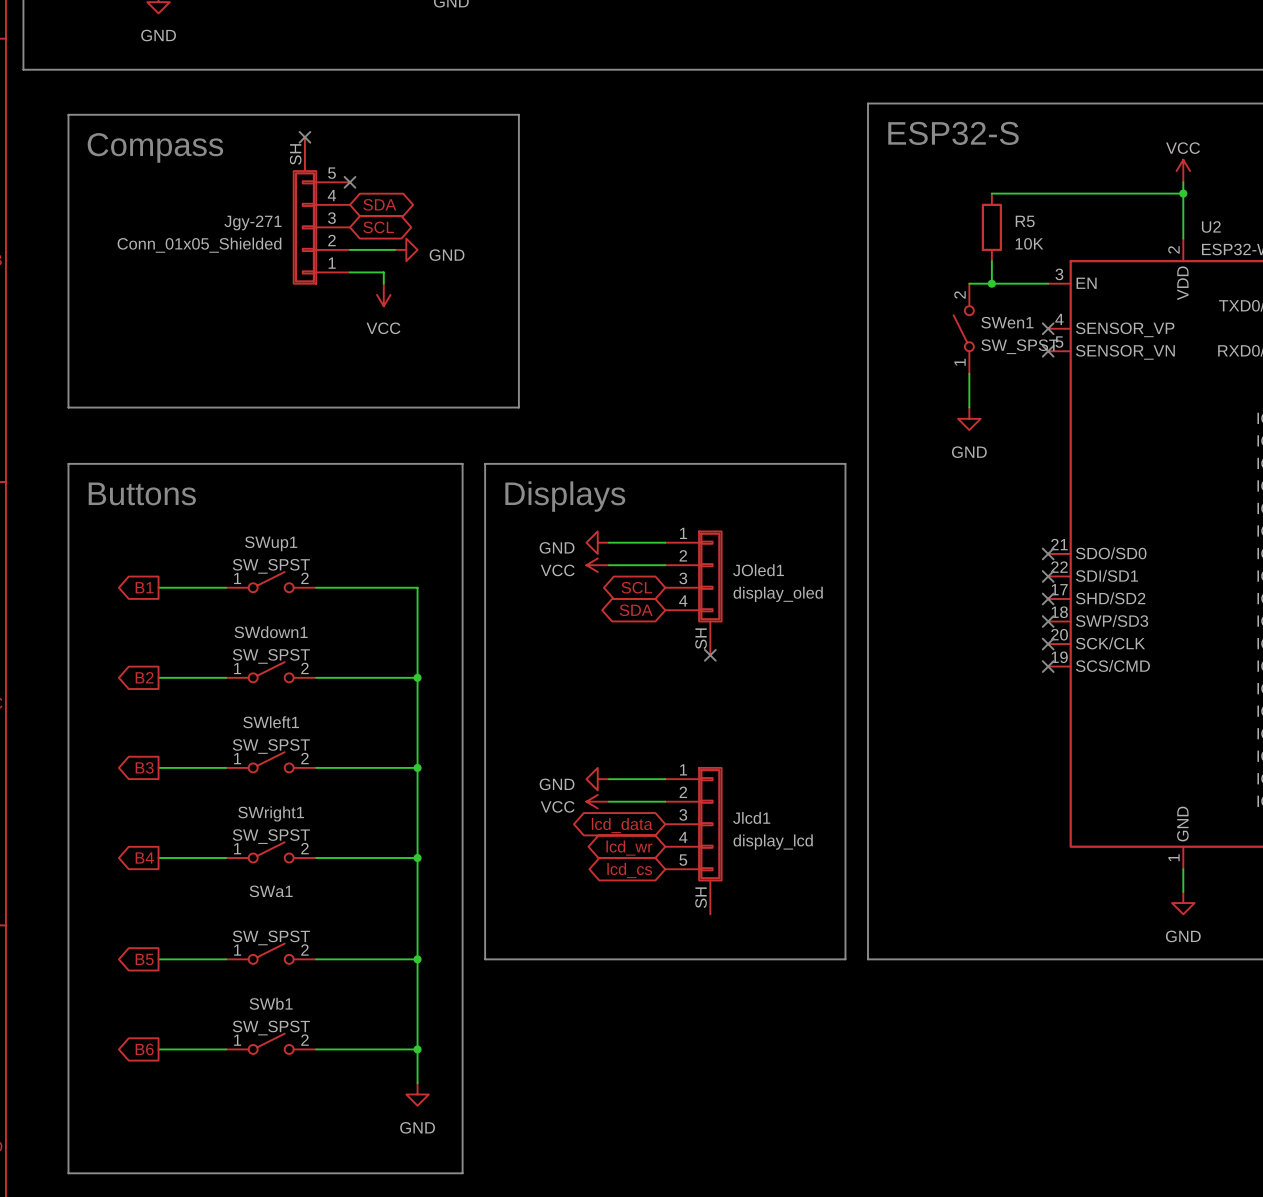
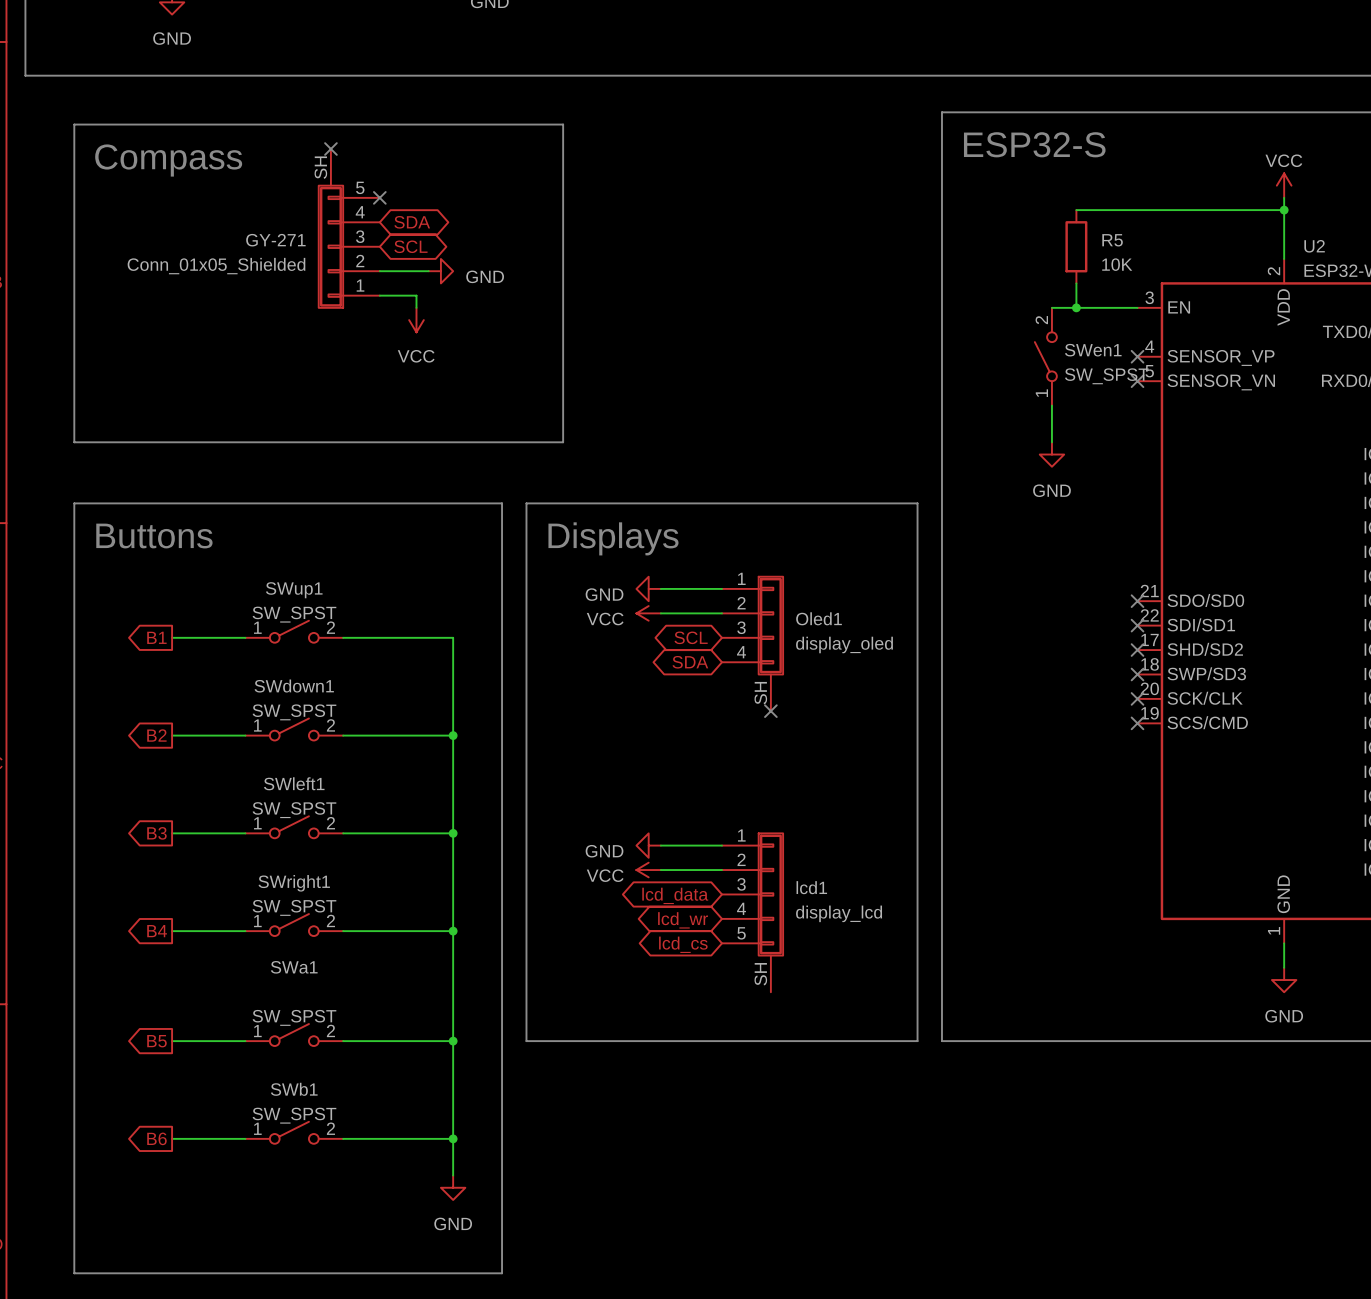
Jgy-271 name: Jgy-271 (253, 222) -> GY-271 (275, 240)
JOled1 name: JOled1 (758, 570) -> Oled1 (819, 618)
Jlcd1 name: Jlcd1 (751, 817) -> lcd1 (811, 887)

